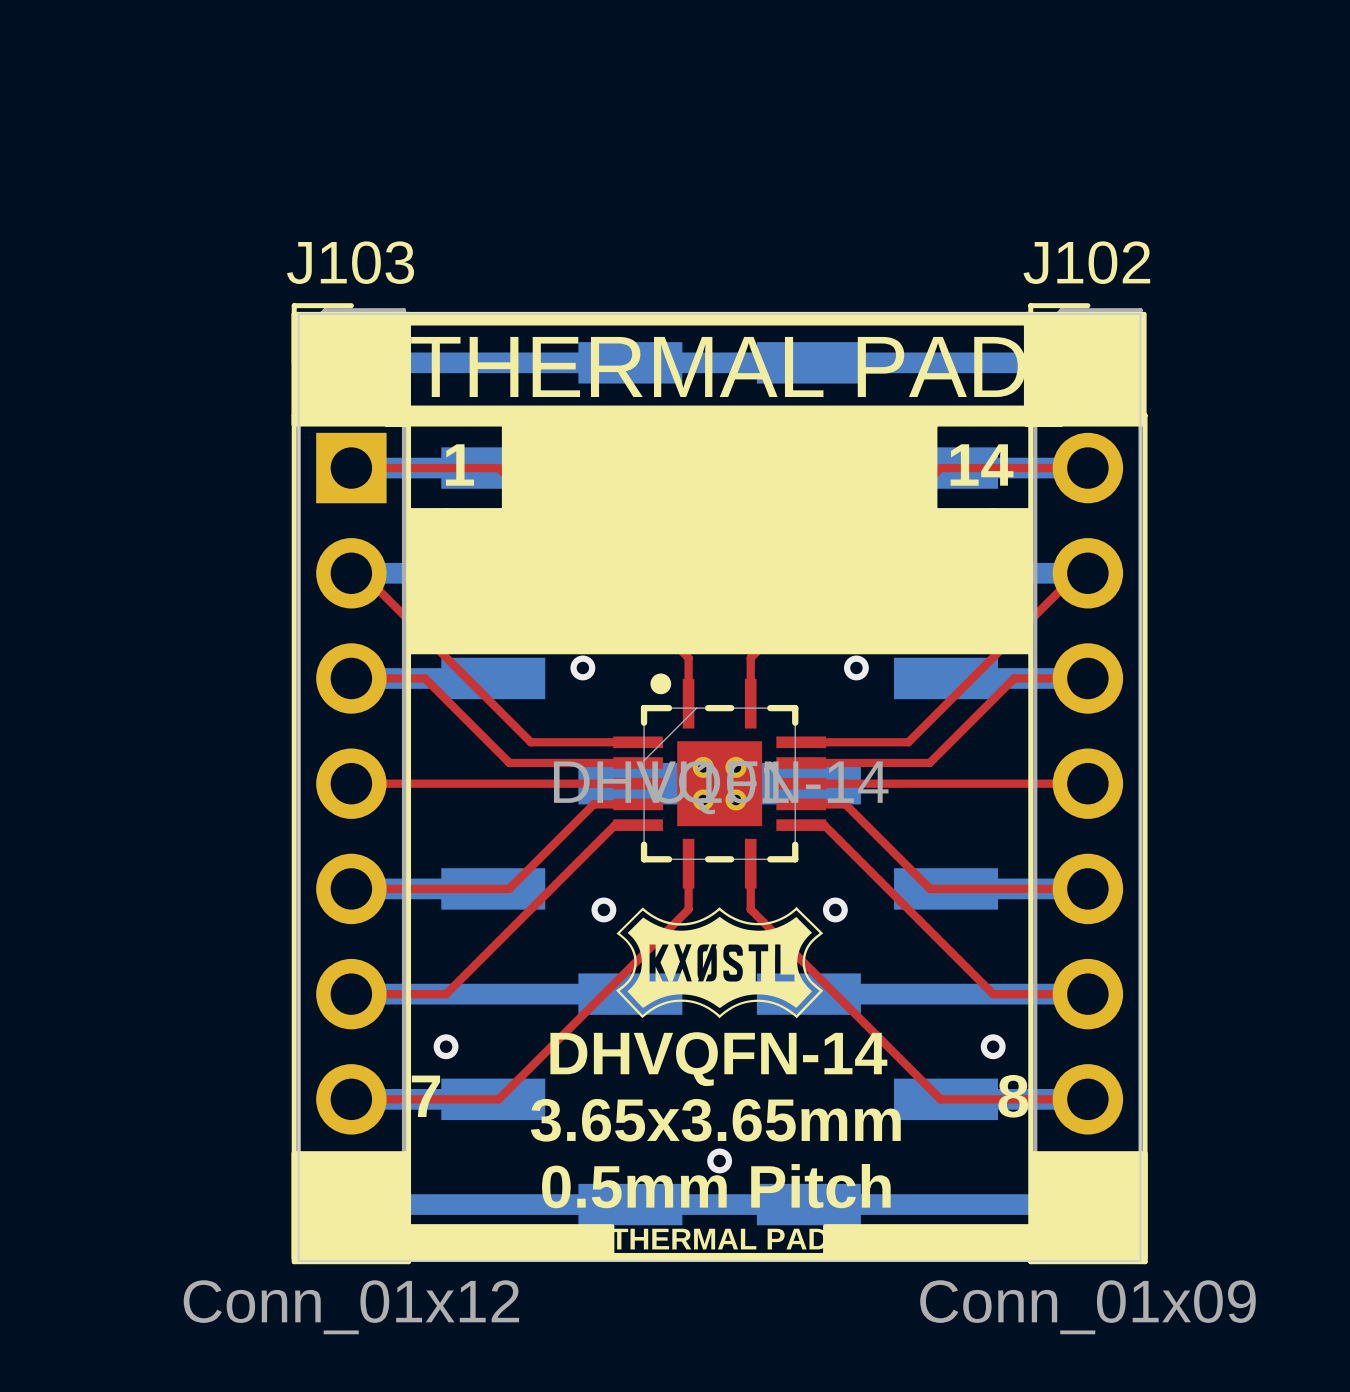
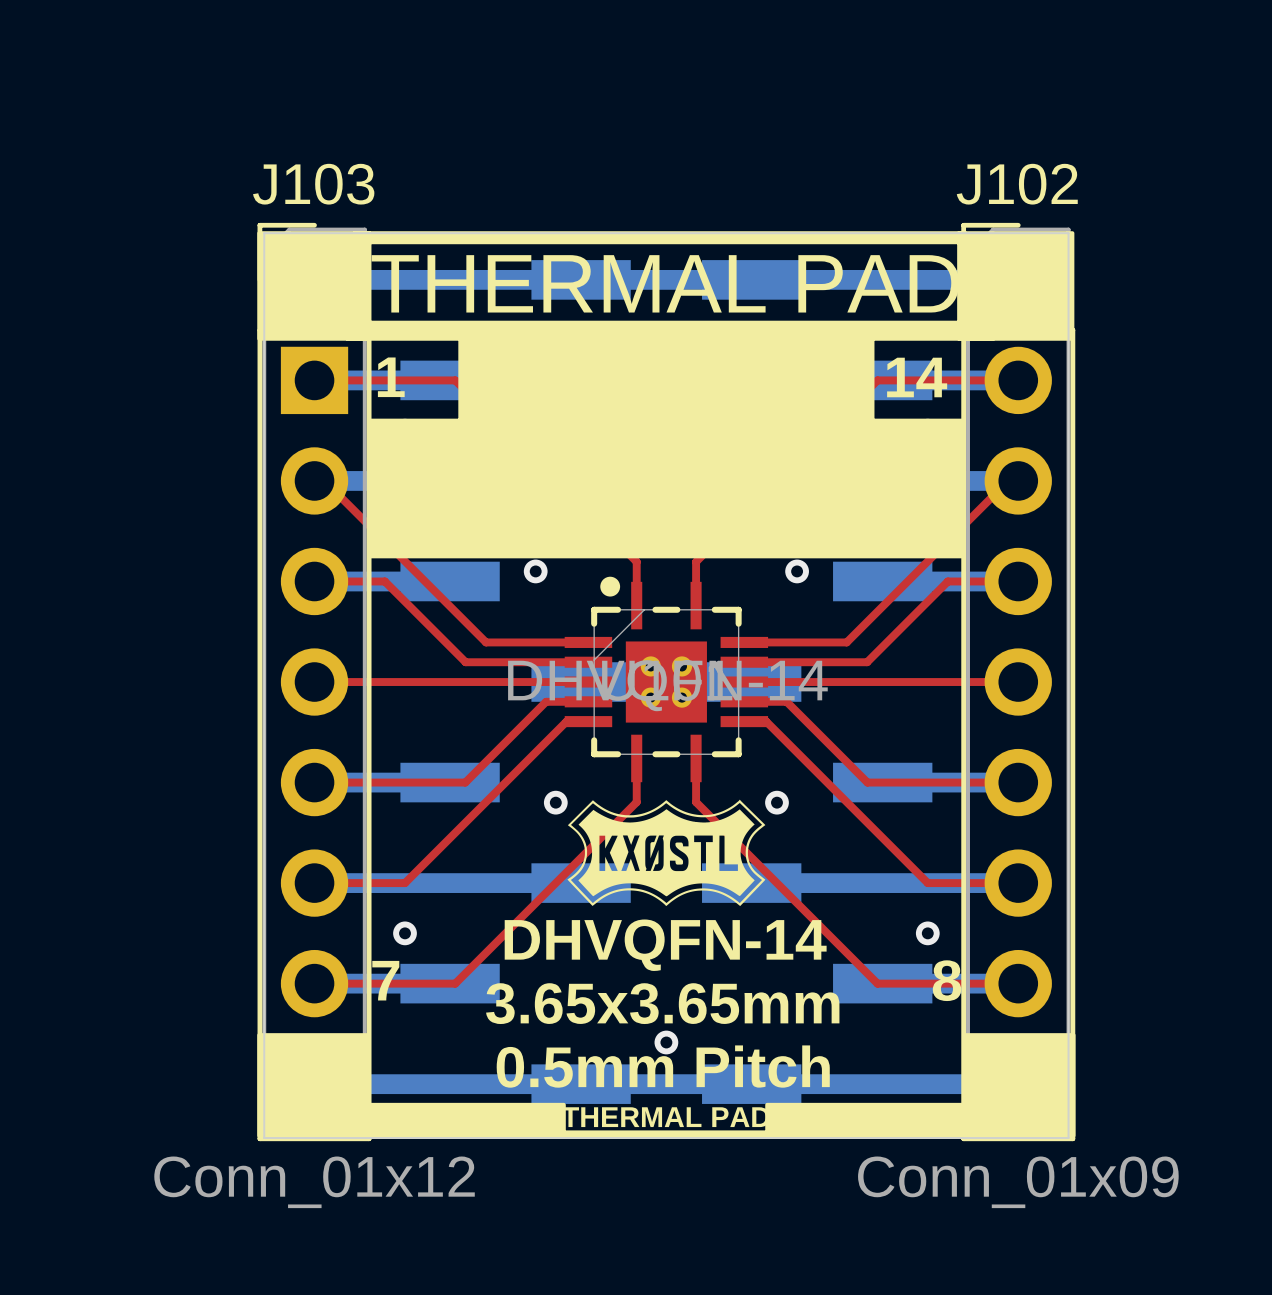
text position: 1 (460, 464) -> 1 (391, 377)

